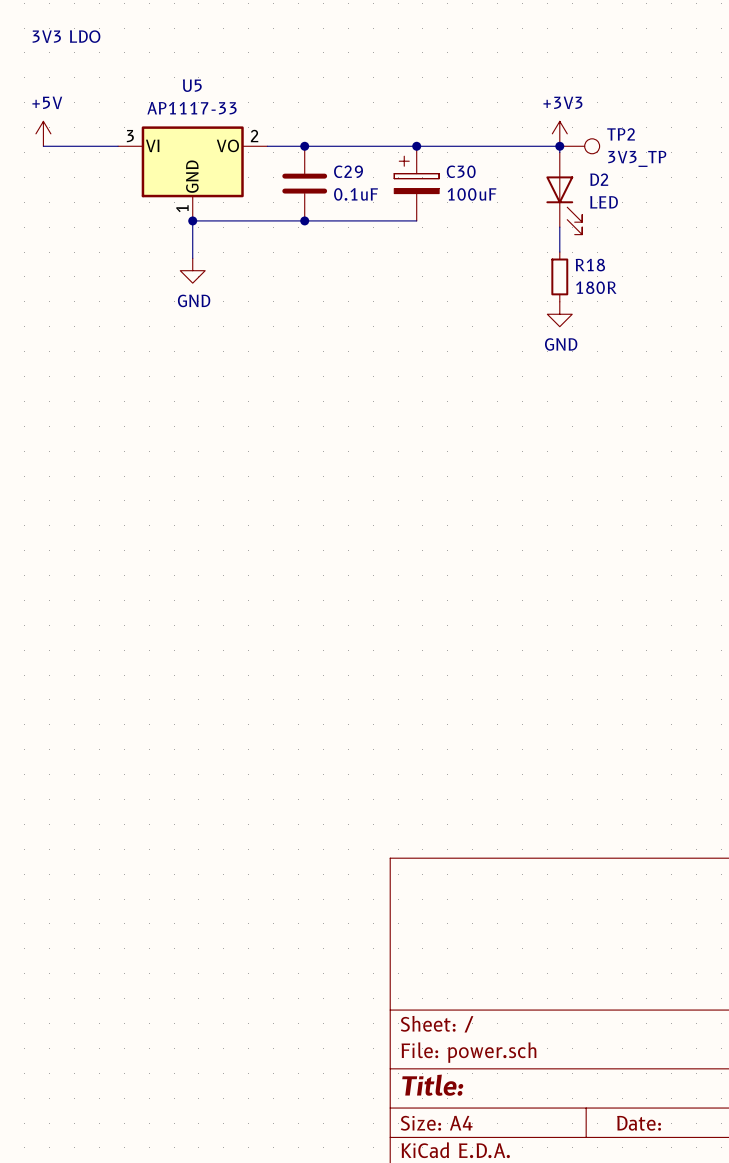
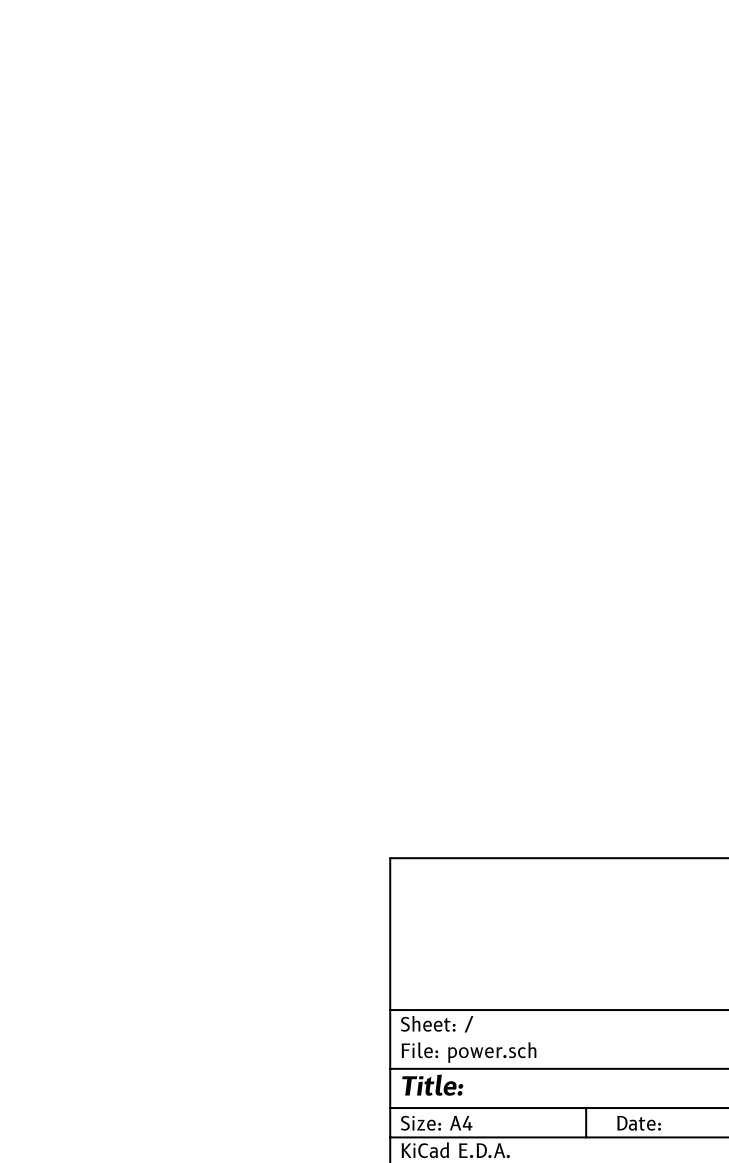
text: 3V3 LDO (66, 36) -> none
power symbol: +5V (43, 133) -> none
power symbol: +3V3 (559, 133) -> none
wire: (43, 146) (118, 146) -> none
wire: (267, 146) (559, 146) (559, 152) -> none
junction: (304, 146) -> none
junction: (416, 146) -> none
junction: (559, 146) -> none
TP2: 3V3_TP (579, 146) -> none
U5: AP1117-33 (192, 173) -> none
C29: 0.1uF (304, 183) -> none
C30: 100uF (416, 183) -> none
D2: LED (564, 193) -> none
junction: (192, 220) -> none
junction: (304, 220) -> none
wire: (416, 220) (192, 220) (192, 258) -> none
wire: (559, 227) (559, 252) -> none
power symbol: GND (192, 270) -> none
R18: 180R (559, 276) -> none
power symbol: GND (559, 314) -> none

